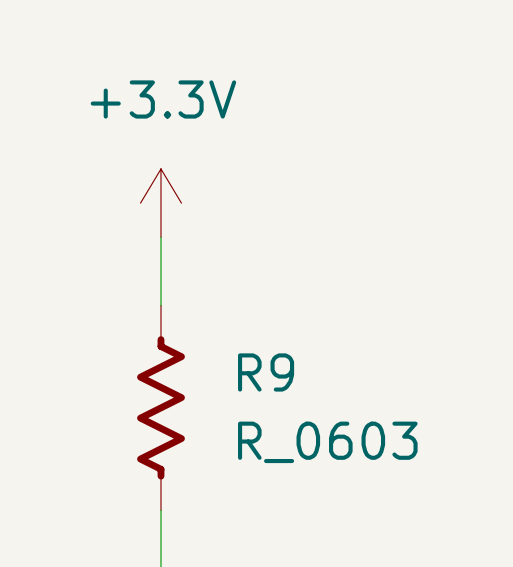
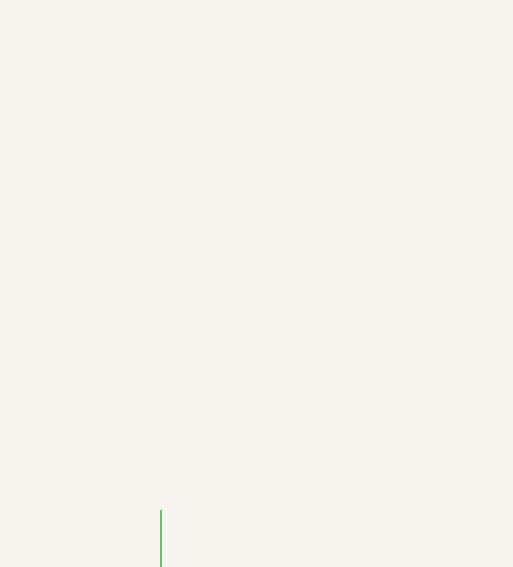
power symbol: +3.3V (160, 203) -> none
wire: (160, 237) (160, 305) -> none
R9: R_0603 (160, 407) -> none

